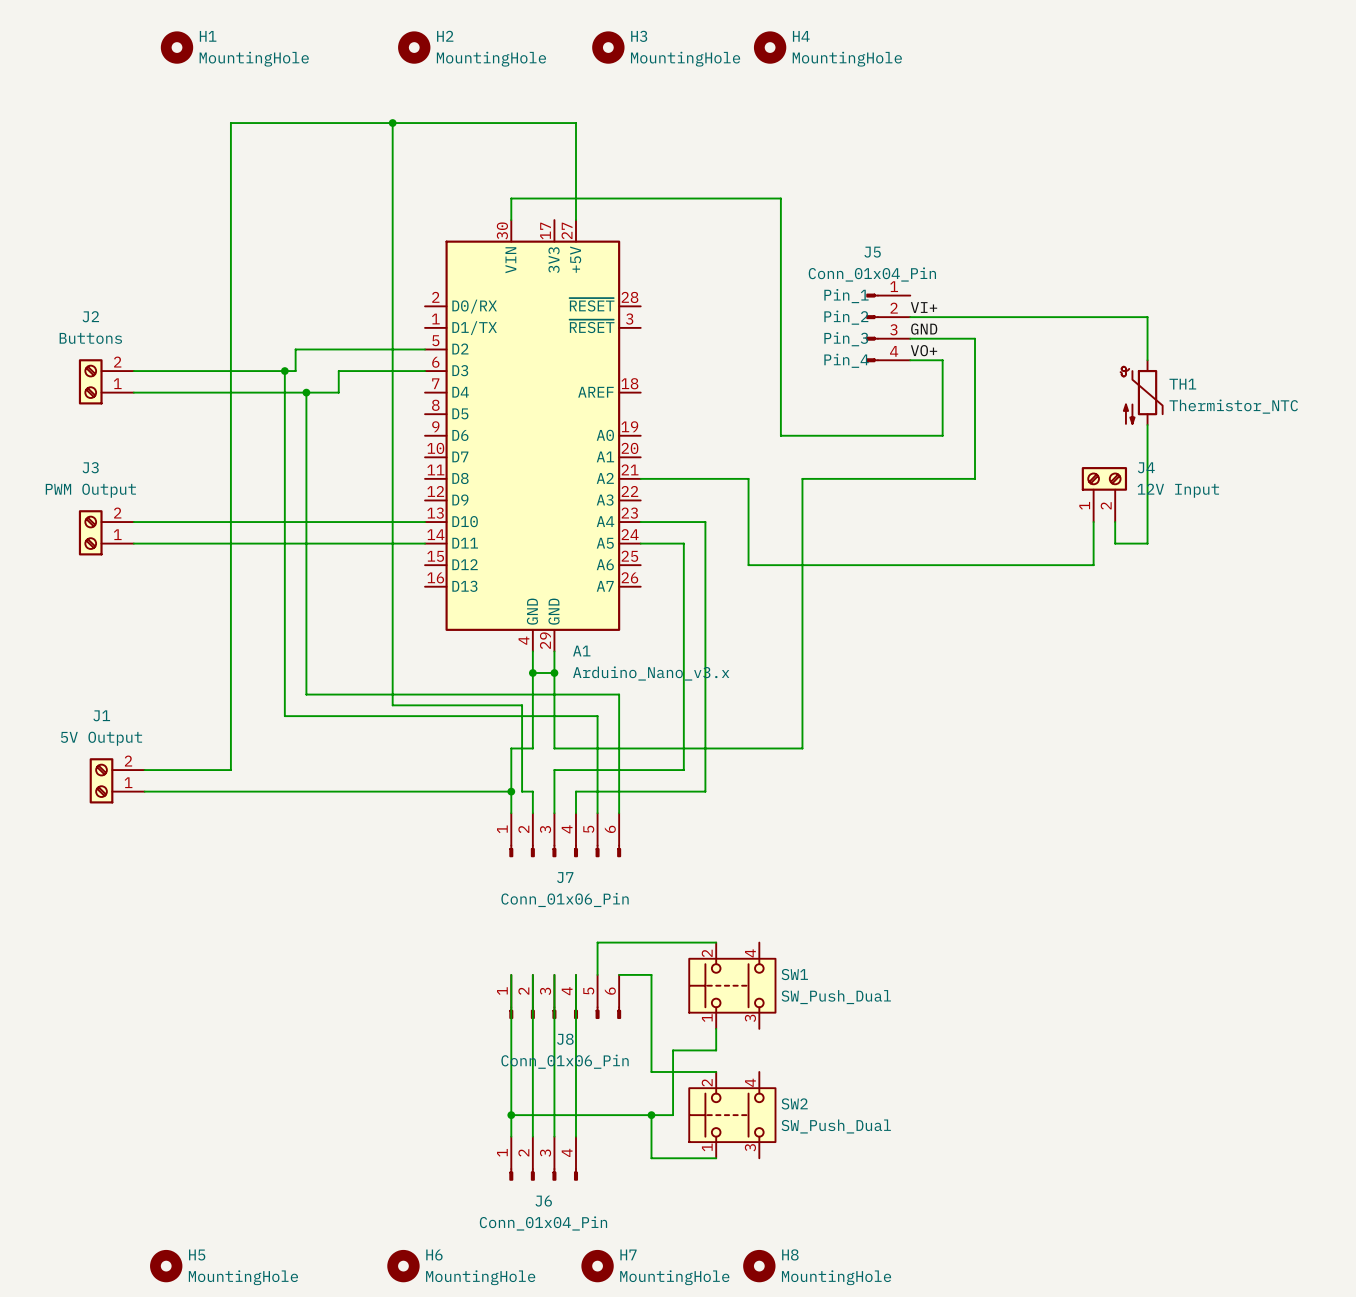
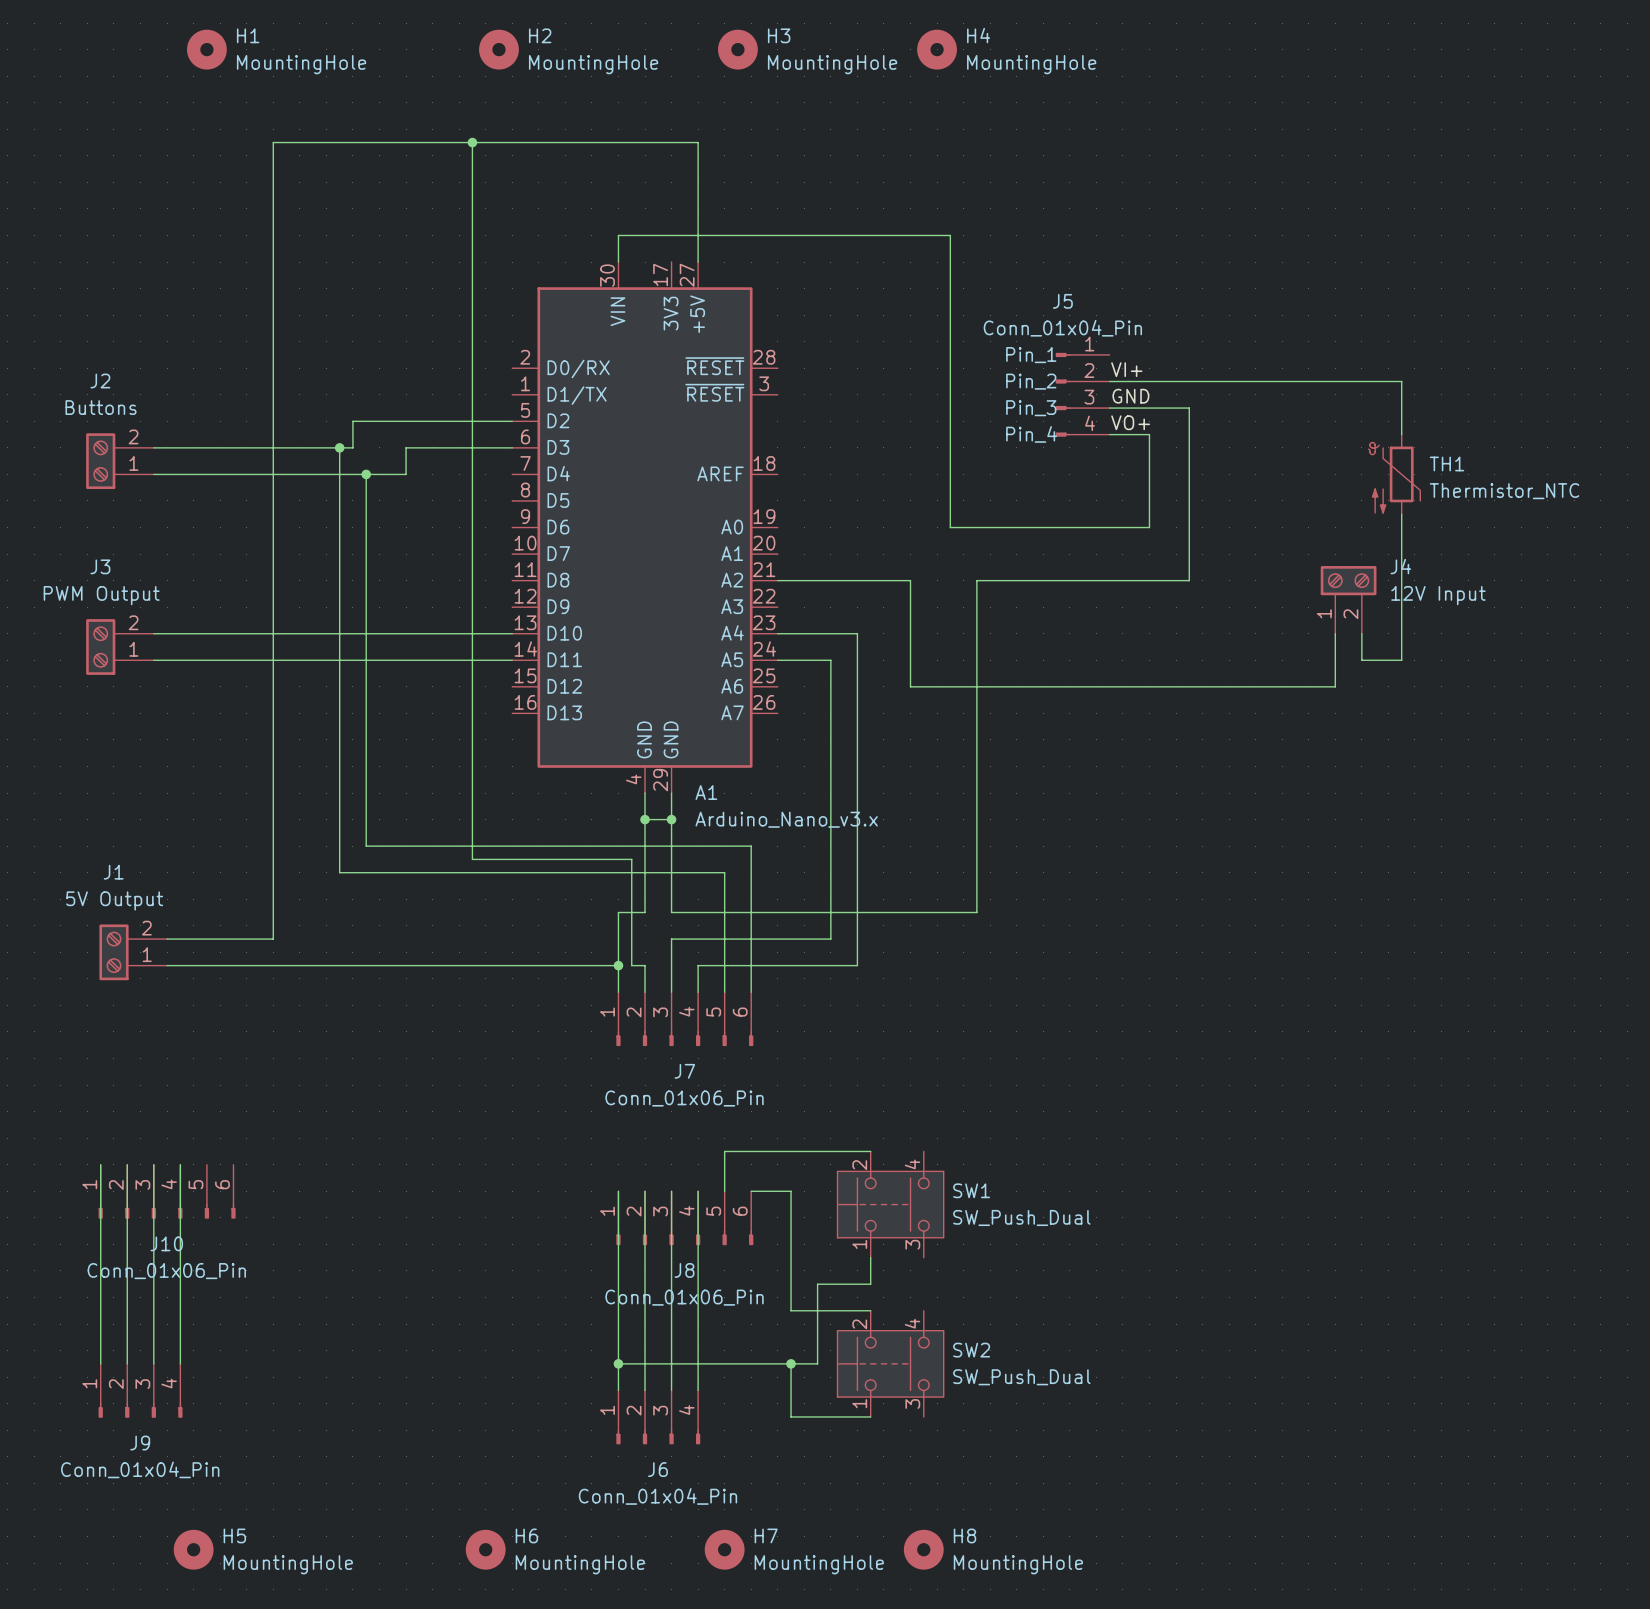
wire: none -> (100, 1164) (100, 1363)
wire: none -> (127, 1164) (127, 1363)
wire: none -> (153, 1164) (153, 1363)
wire: none -> (180, 1164) (180, 1363)
J10: none -> Conn_01x06_Pin (167, 1191)
J9: none -> Conn_01x04_Pin (140, 1390)

